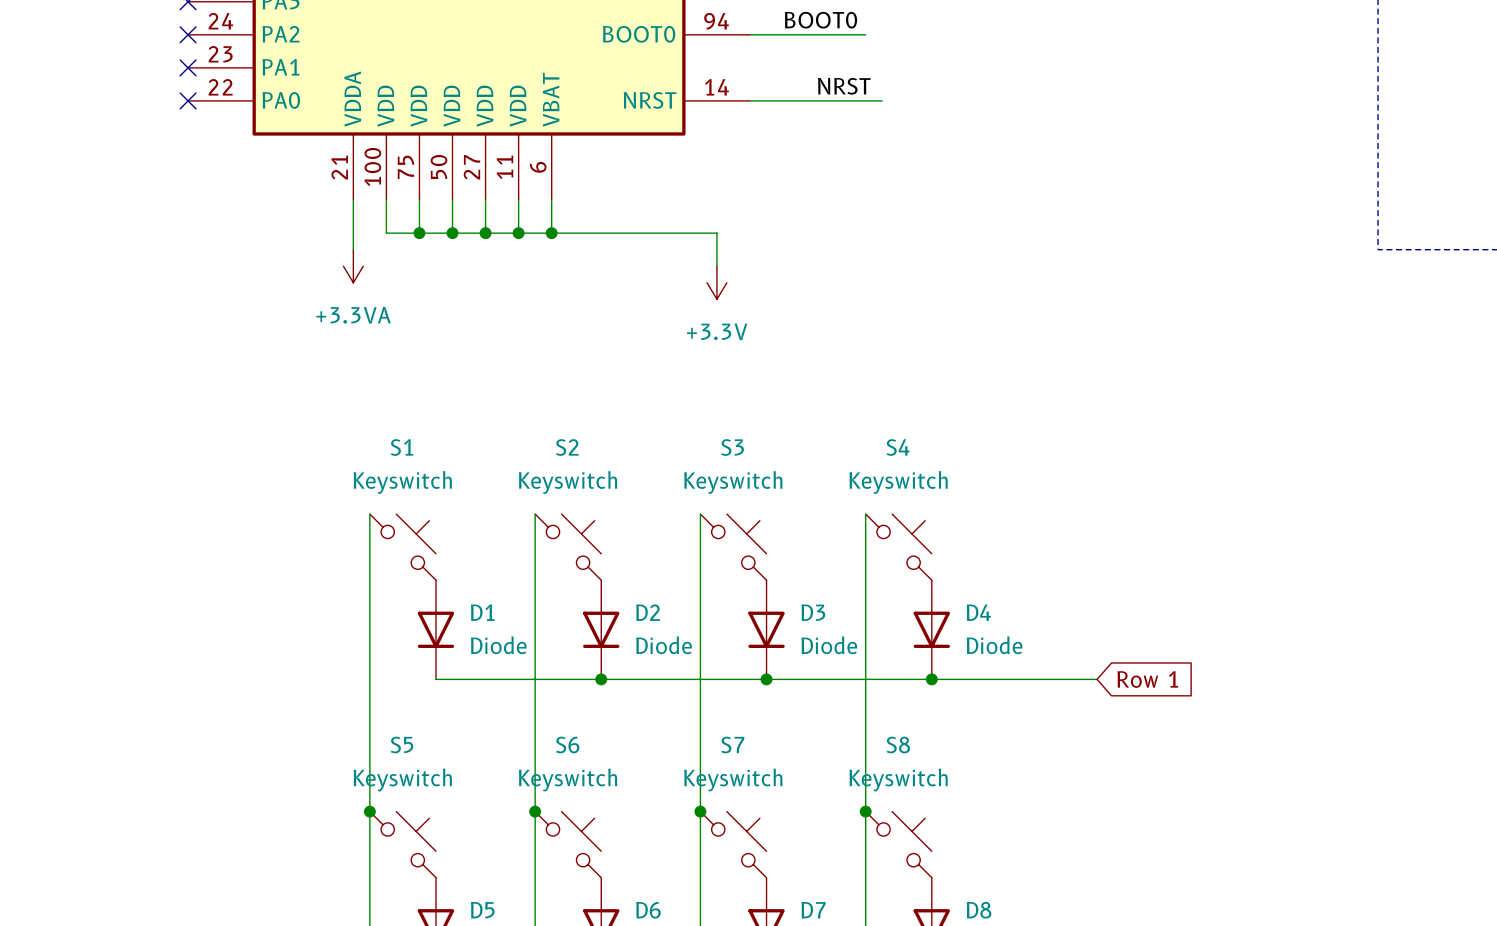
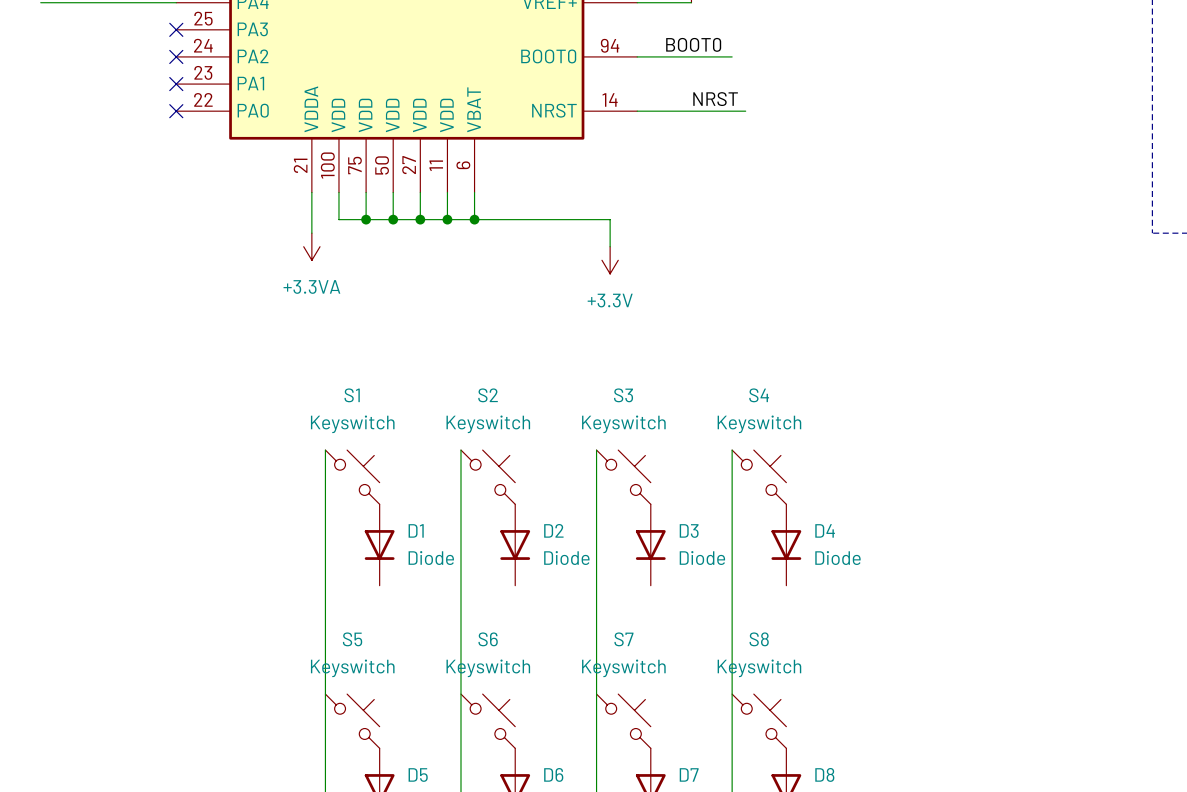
wire: (435, 679) (1097, 679) -> none
junction: (601, 679) -> none
junction: (766, 679) -> none
junction: (931, 679) -> none
global label: Row 1 (1147, 679) -> none
junction: (369, 811) -> none
junction: (535, 811) -> none
junction: (700, 811) -> none
junction: (865, 811) -> none

